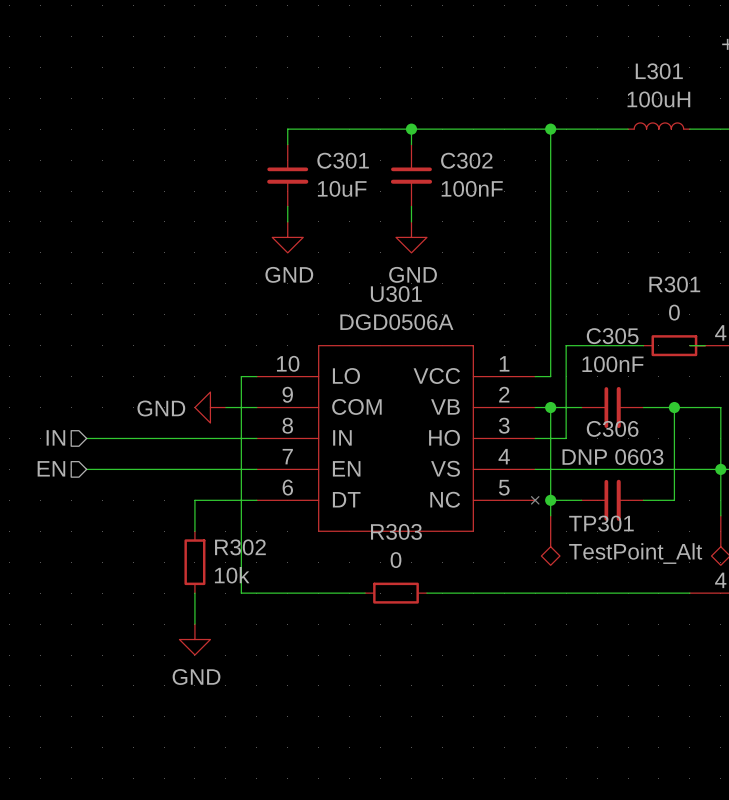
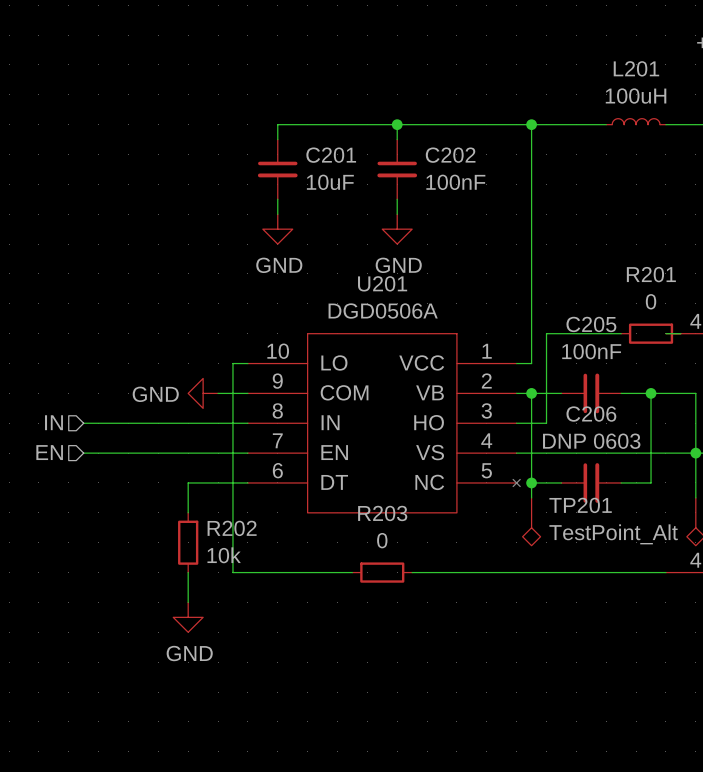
L301 name: L301 (659, 71) -> L201 (636, 68)
C301 name: C301 (343, 160) -> C201 (331, 155)
C302 name: C302 (466, 160) -> C202 (450, 155)
R301 name: R301 (674, 284) -> R201 (651, 274)
U301 name: U301 (396, 294) -> U201 (382, 283)
C305 name: C305 (612, 336) -> C205 (591, 324)
C306 name: C306 (612, 428) -> C206 (591, 414)
TP301 name: TP301 (601, 523) -> TP201 (580, 505)
R303 name: R303 (396, 531) -> R203 (382, 513)
R302 name: R302 (240, 547) -> R202 (232, 528)

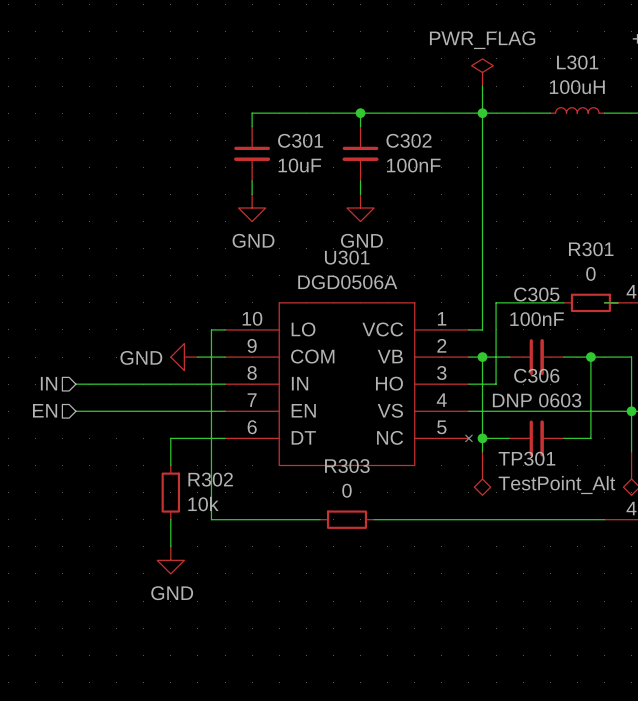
L201 name: L201 (636, 68) -> L301 (577, 62)
power symbol: none -> PWR_FLAG (482, 72)
wire: none -> (482, 86) (482, 113)
C201 name: C201 (331, 155) -> C301 (300, 140)
C202 name: C202 (450, 155) -> C302 (409, 140)
R201 name: R201 (651, 274) -> R301 (591, 249)
U201 name: U201 (382, 283) -> U301 (347, 257)
C205 name: C205 (591, 324) -> C305 (536, 294)
C206 name: C206 (591, 414) -> C306 (536, 375)
TP201 name: TP201 (580, 505) -> TP301 (526, 458)
R203 name: R203 (382, 513) -> R303 (347, 466)
R202 name: R202 (232, 528) -> R302 (210, 479)

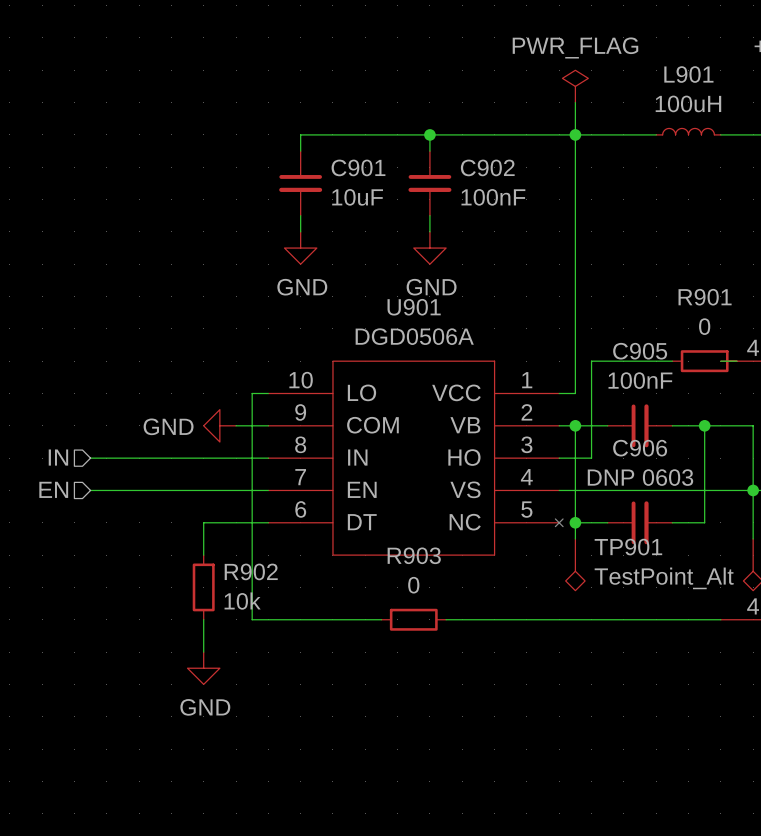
L301 name: L301 (577, 62) -> L901 (688, 74)
C301 name: C301 (300, 140) -> C901 (358, 167)
C302 name: C302 (409, 140) -> C902 (487, 167)
R301 name: R301 (591, 249) -> R901 (705, 297)
U301 name: U301 (347, 257) -> U901 (414, 307)
C305 name: C305 (536, 294) -> C905 (640, 351)
C306 name: C306 (536, 375) -> C906 (640, 448)
TP301 name: TP301 (526, 458) -> TP901 (628, 547)
R303 name: R303 (347, 466) -> R903 (414, 555)
R302 name: R302 (210, 479) -> R902 (251, 571)

